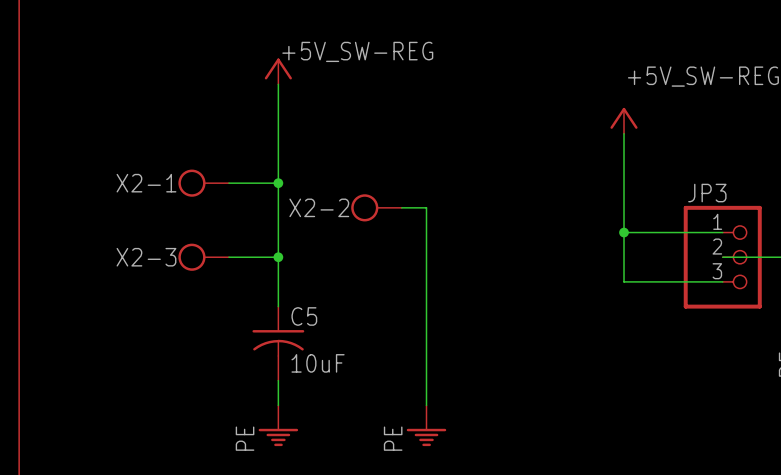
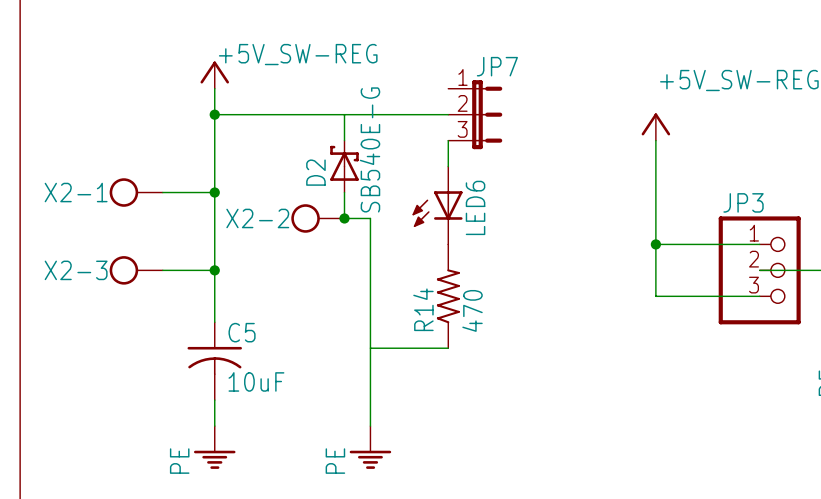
power symbol position: +5V_SW-REG (278, 71) -> +5V_SW-REG (214, 75)
wire: (278, 84) (278, 306) -> (214, 88) (214, 322)
wire: none -> (214, 114) (448, 114)
junction: none -> (214, 114)
wire: none -> (344, 114) (344, 140)
JP7: none -> (475, 114)
wire: none -> (448, 140) (448, 166)
D2: none -> SB540E-G (344, 166)
X2-1 position: (203, 183) -> (136, 192)
junction: none -> (214, 192)
wire: (228, 183) (278, 183) -> (162, 192) (214, 192)
junction: (278, 183) -> none
wire: none -> (344, 192) (344, 218) (370, 218) (370, 426)
LED6: none -> (437, 205)
junction: none -> (344, 218)
X2-2 position: (376, 207) -> (317, 218)
wire: (401, 207) (426, 207) (426, 405) -> none
X2-3 position: (203, 257) -> (136, 270)
junction: none -> (214, 270)
wire: (228, 257) (278, 257) -> (162, 270) (214, 270)
junction: (278, 257) -> none
R14: none -> 470 (448, 296)
wire: none -> (370, 348) (448, 348)
C5 position: (278, 343) -> (214, 361)
wire: (278, 380) (278, 405) -> (214, 400) (214, 426)
power symbol: none -> PE (214, 447)
power symbol: PE (278, 425) -> none
power symbol: none -> PE (370, 447)
power symbol: PE (426, 425) -> none

